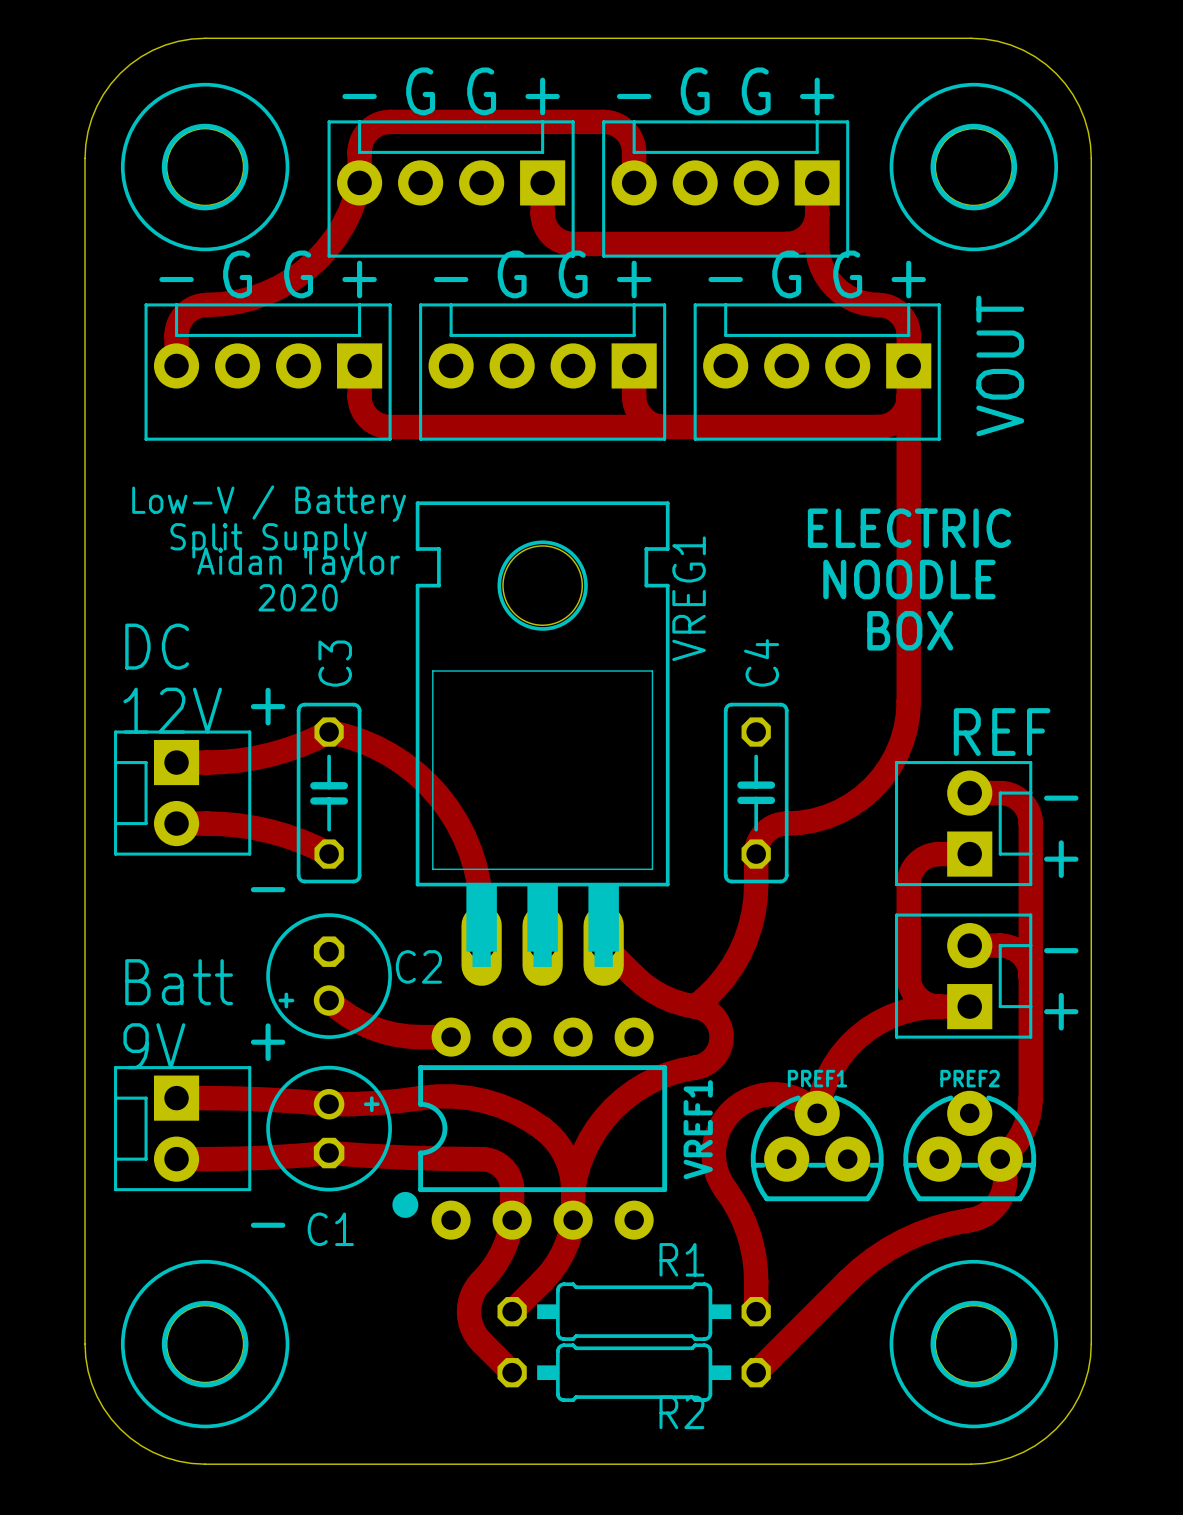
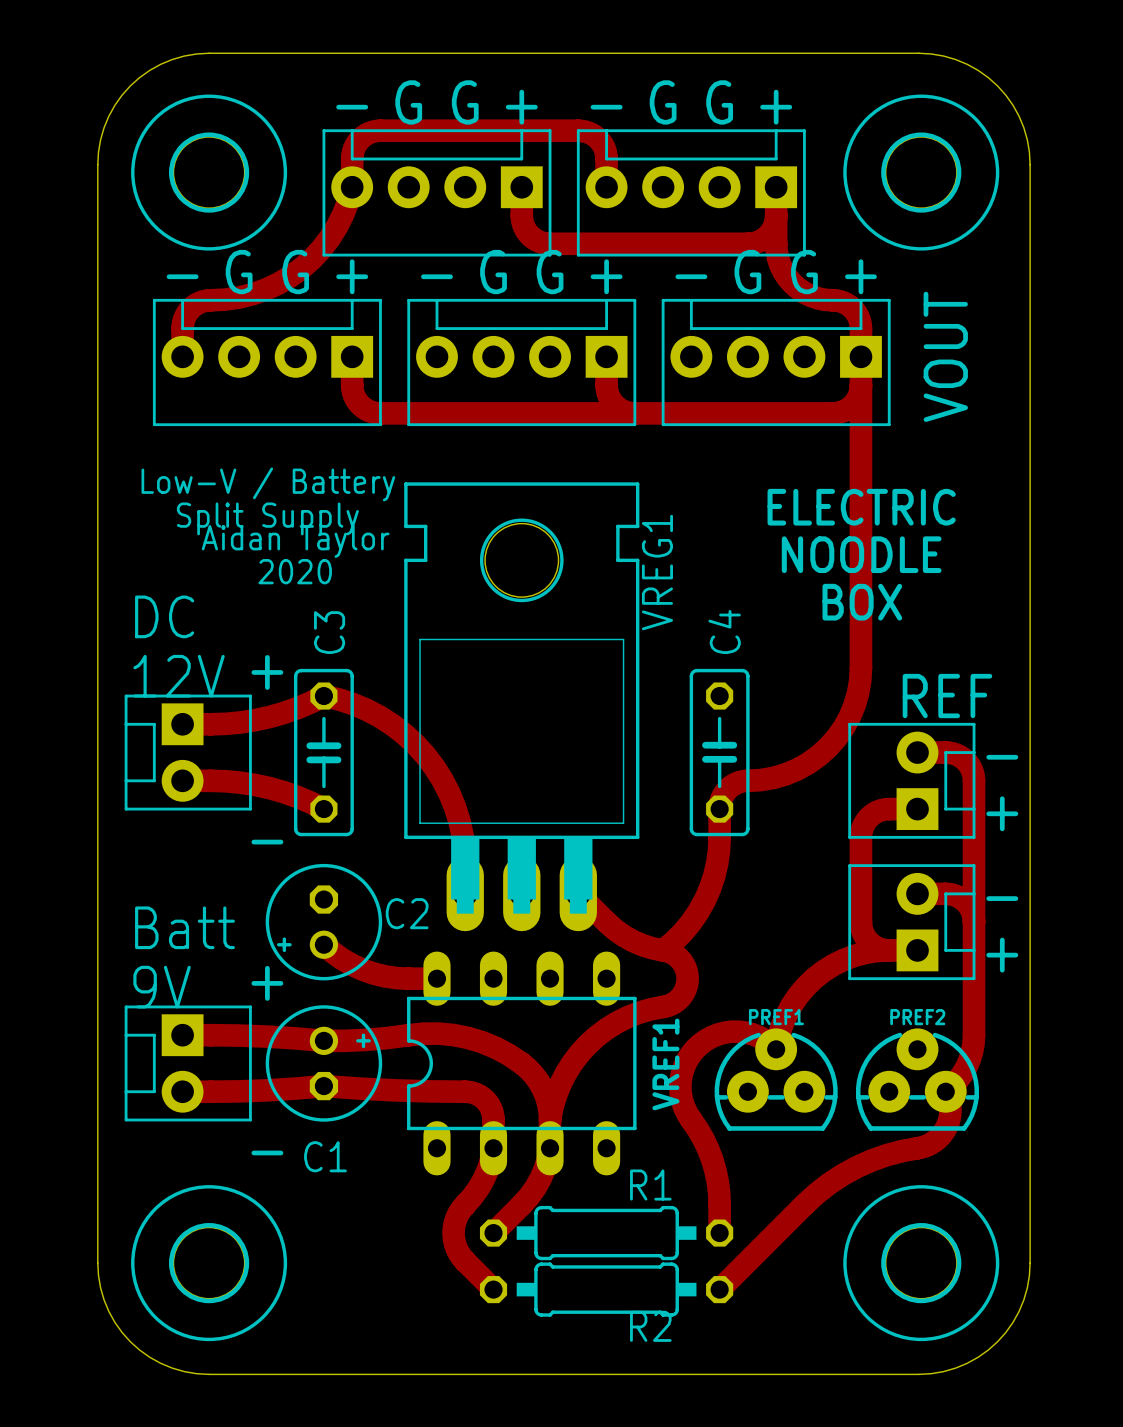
VREF1 footprint: [392, 1017, 668, 1240] -> [407, 951, 637, 1176]

